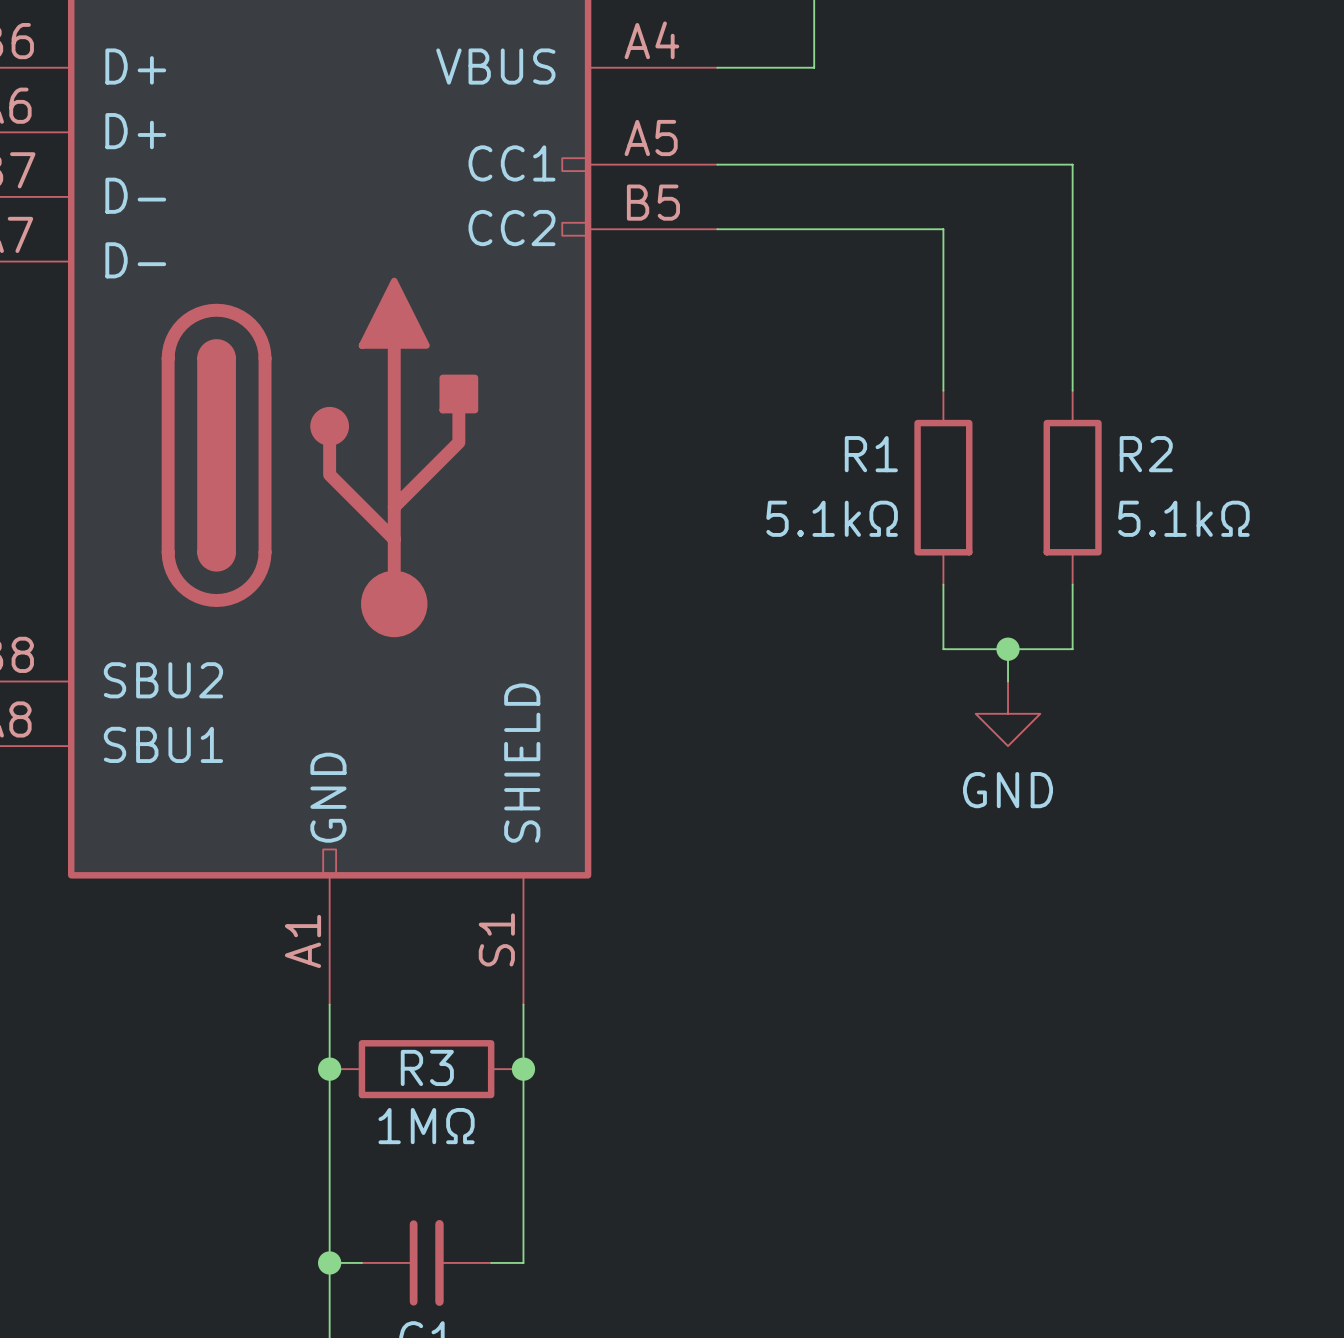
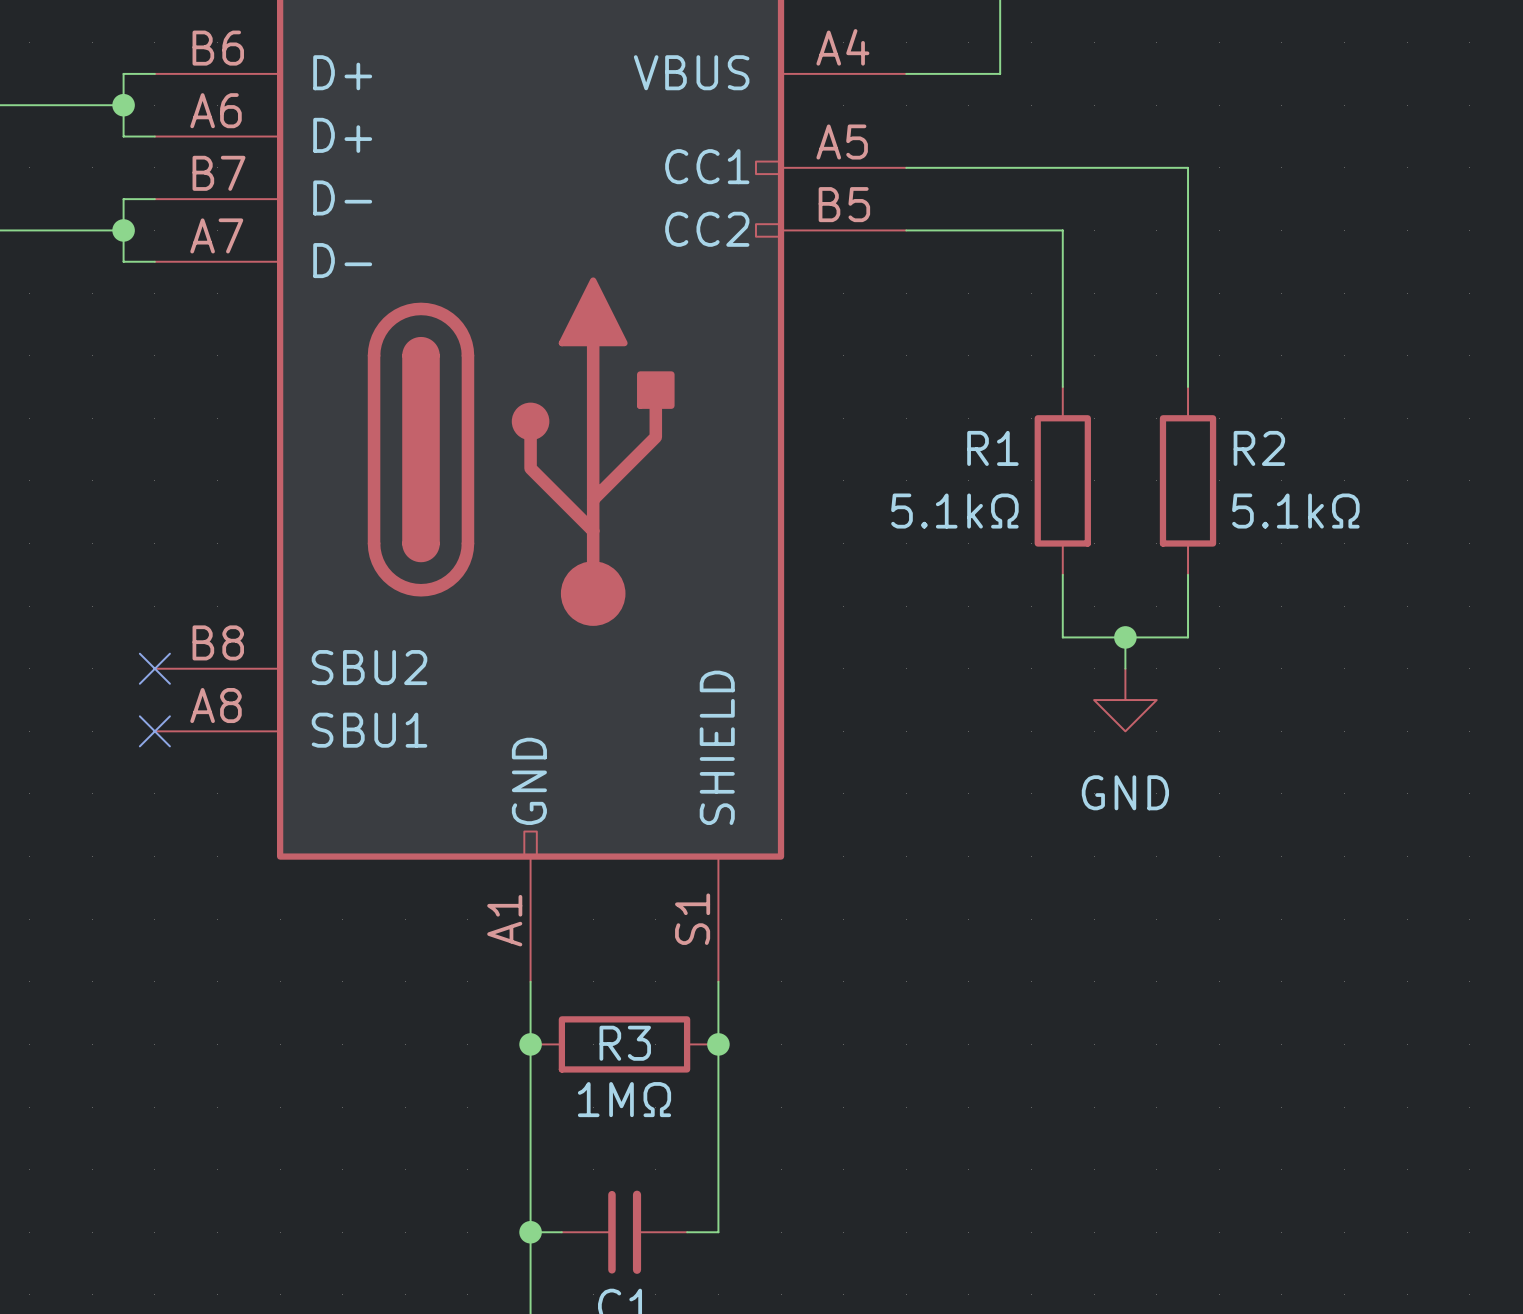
wire: (1008, 164) (1072, 164) (1072, 390) -> (1188, 167) (1188, 386)
wire: (878, 229) (943, 229) (943, 390) -> (1062, 230) (1062, 386)
R1 position: (943, 487) -> (1062, 480)
R2 position: (1072, 487) -> (1188, 480)
wire: none -> (1062, 574) (1062, 637) (1125, 637) (1125, 668)
wire: (943, 584) (943, 649) -> (1188, 574) (1188, 637)
wire: (1072, 584) (1072, 649) (1008, 649) (1008, 681) -> none
junction position: (1008, 649) -> (1125, 637)
power symbol position: GND (1008, 713) -> GND (1125, 700)
power symbol text position: GND (1008, 790) -> GND (1125, 792)

